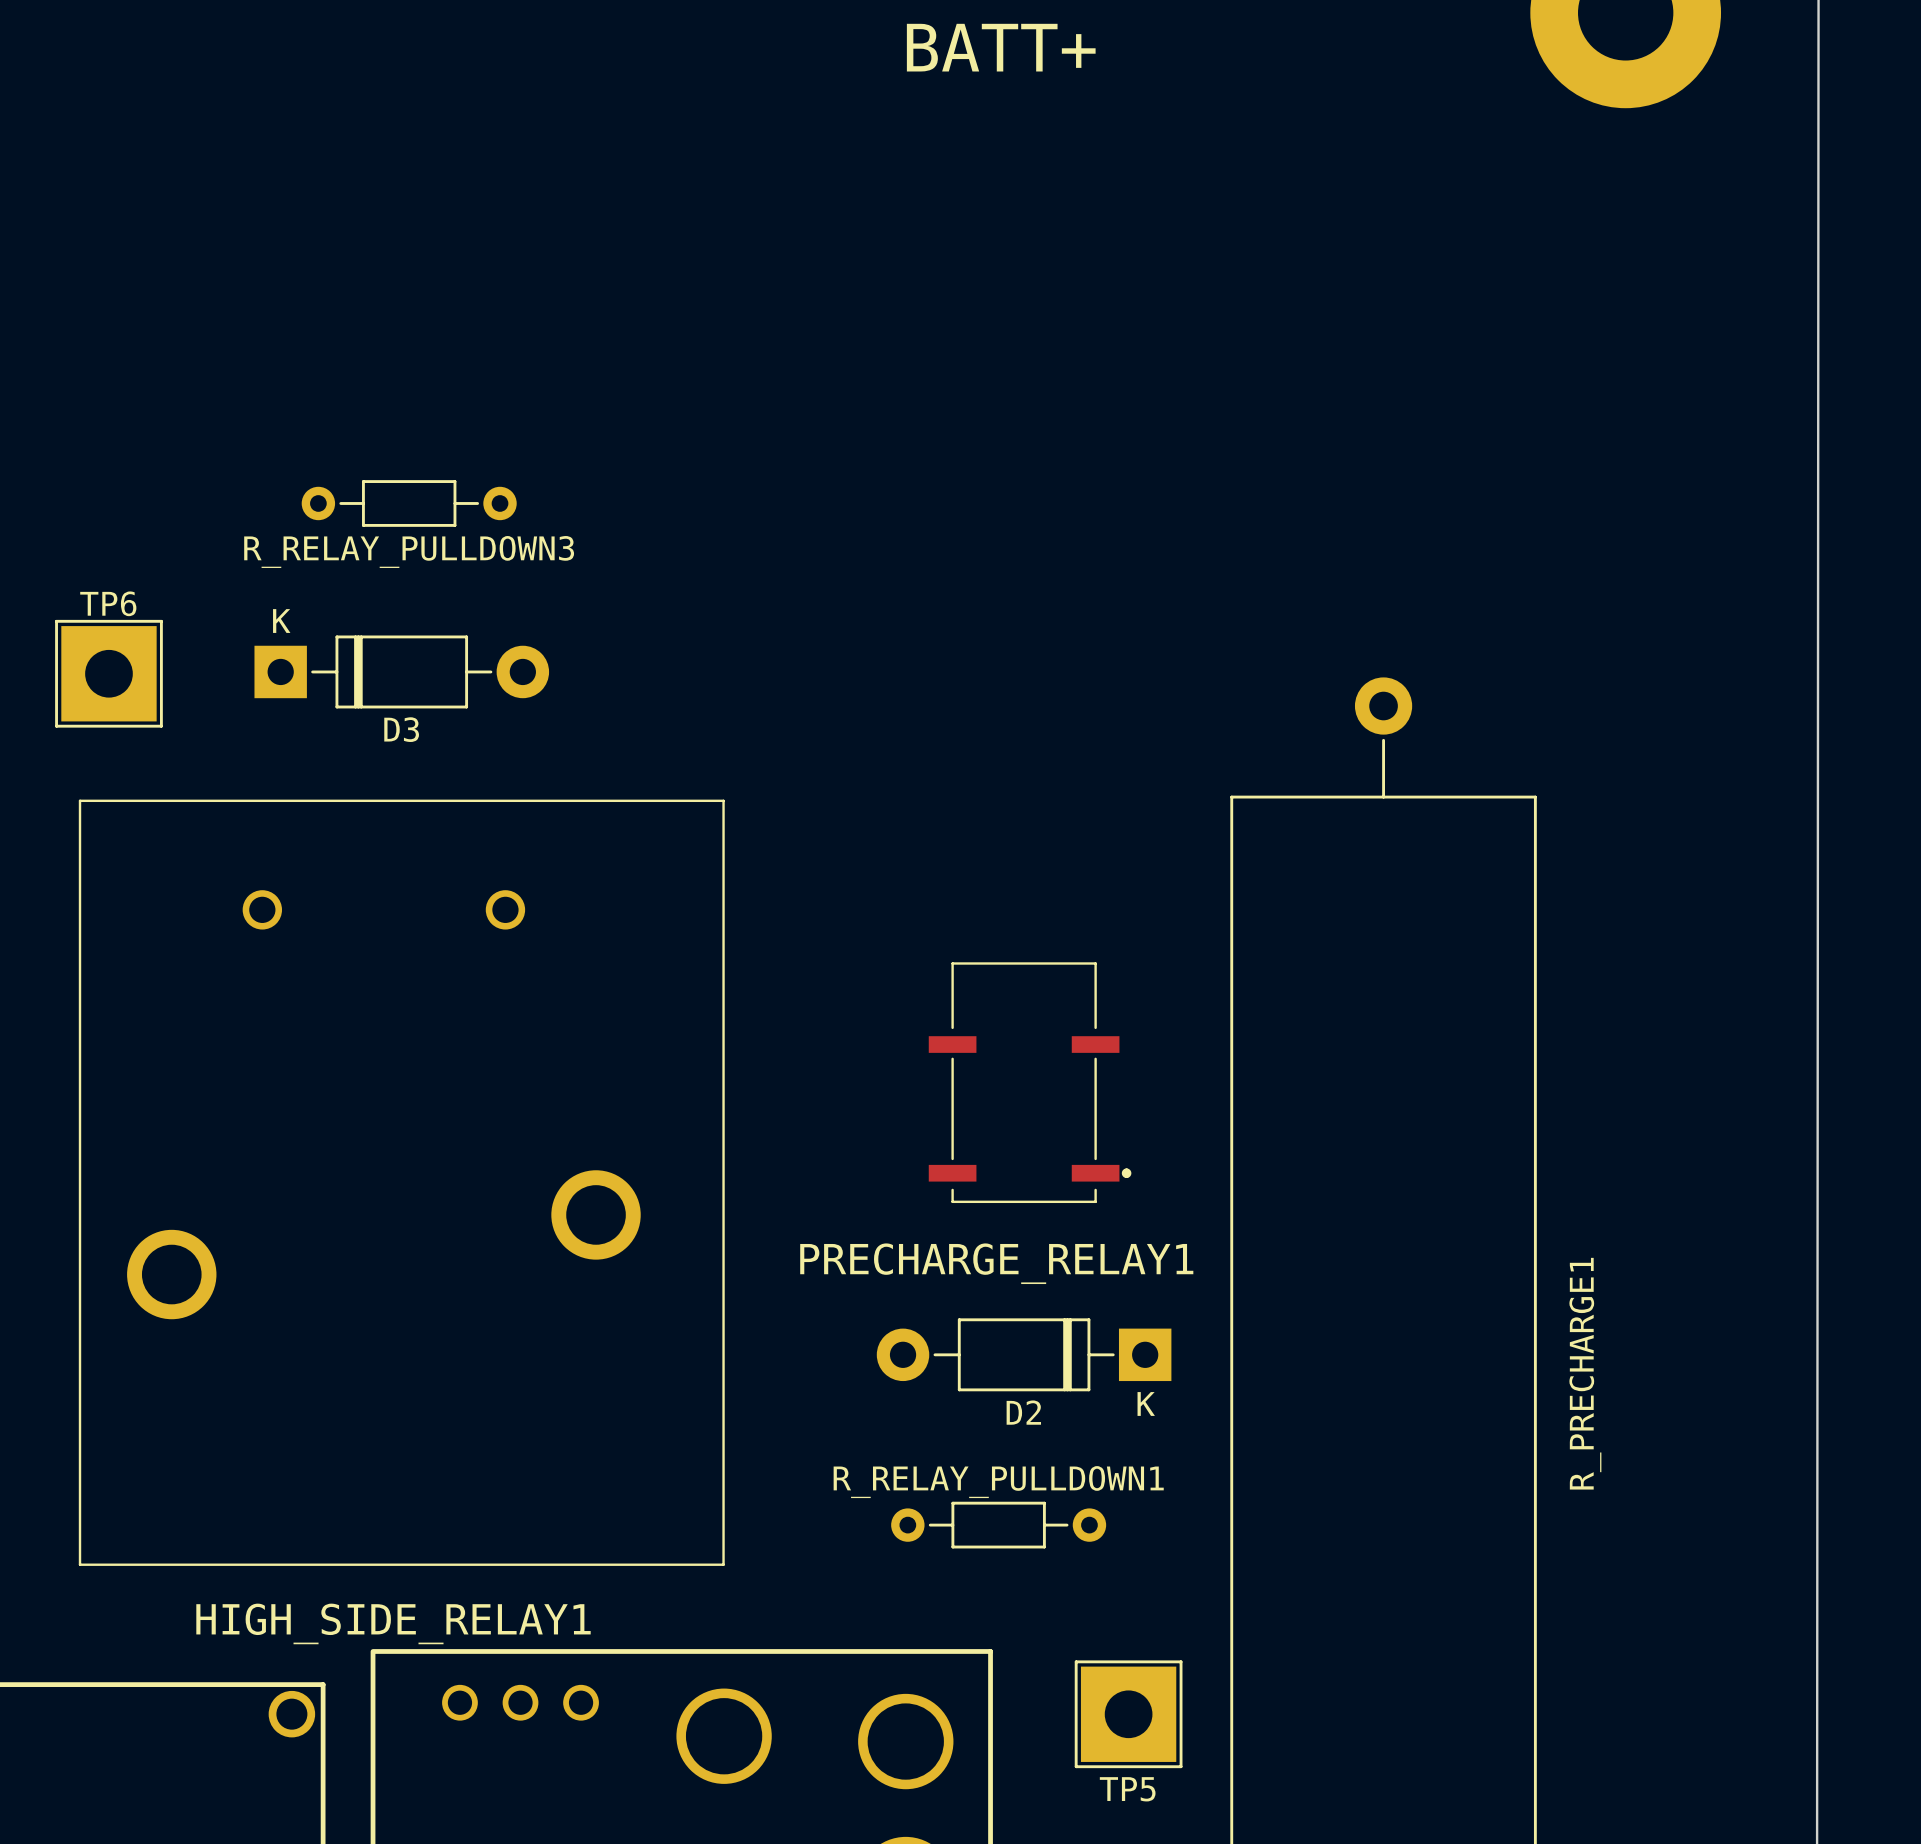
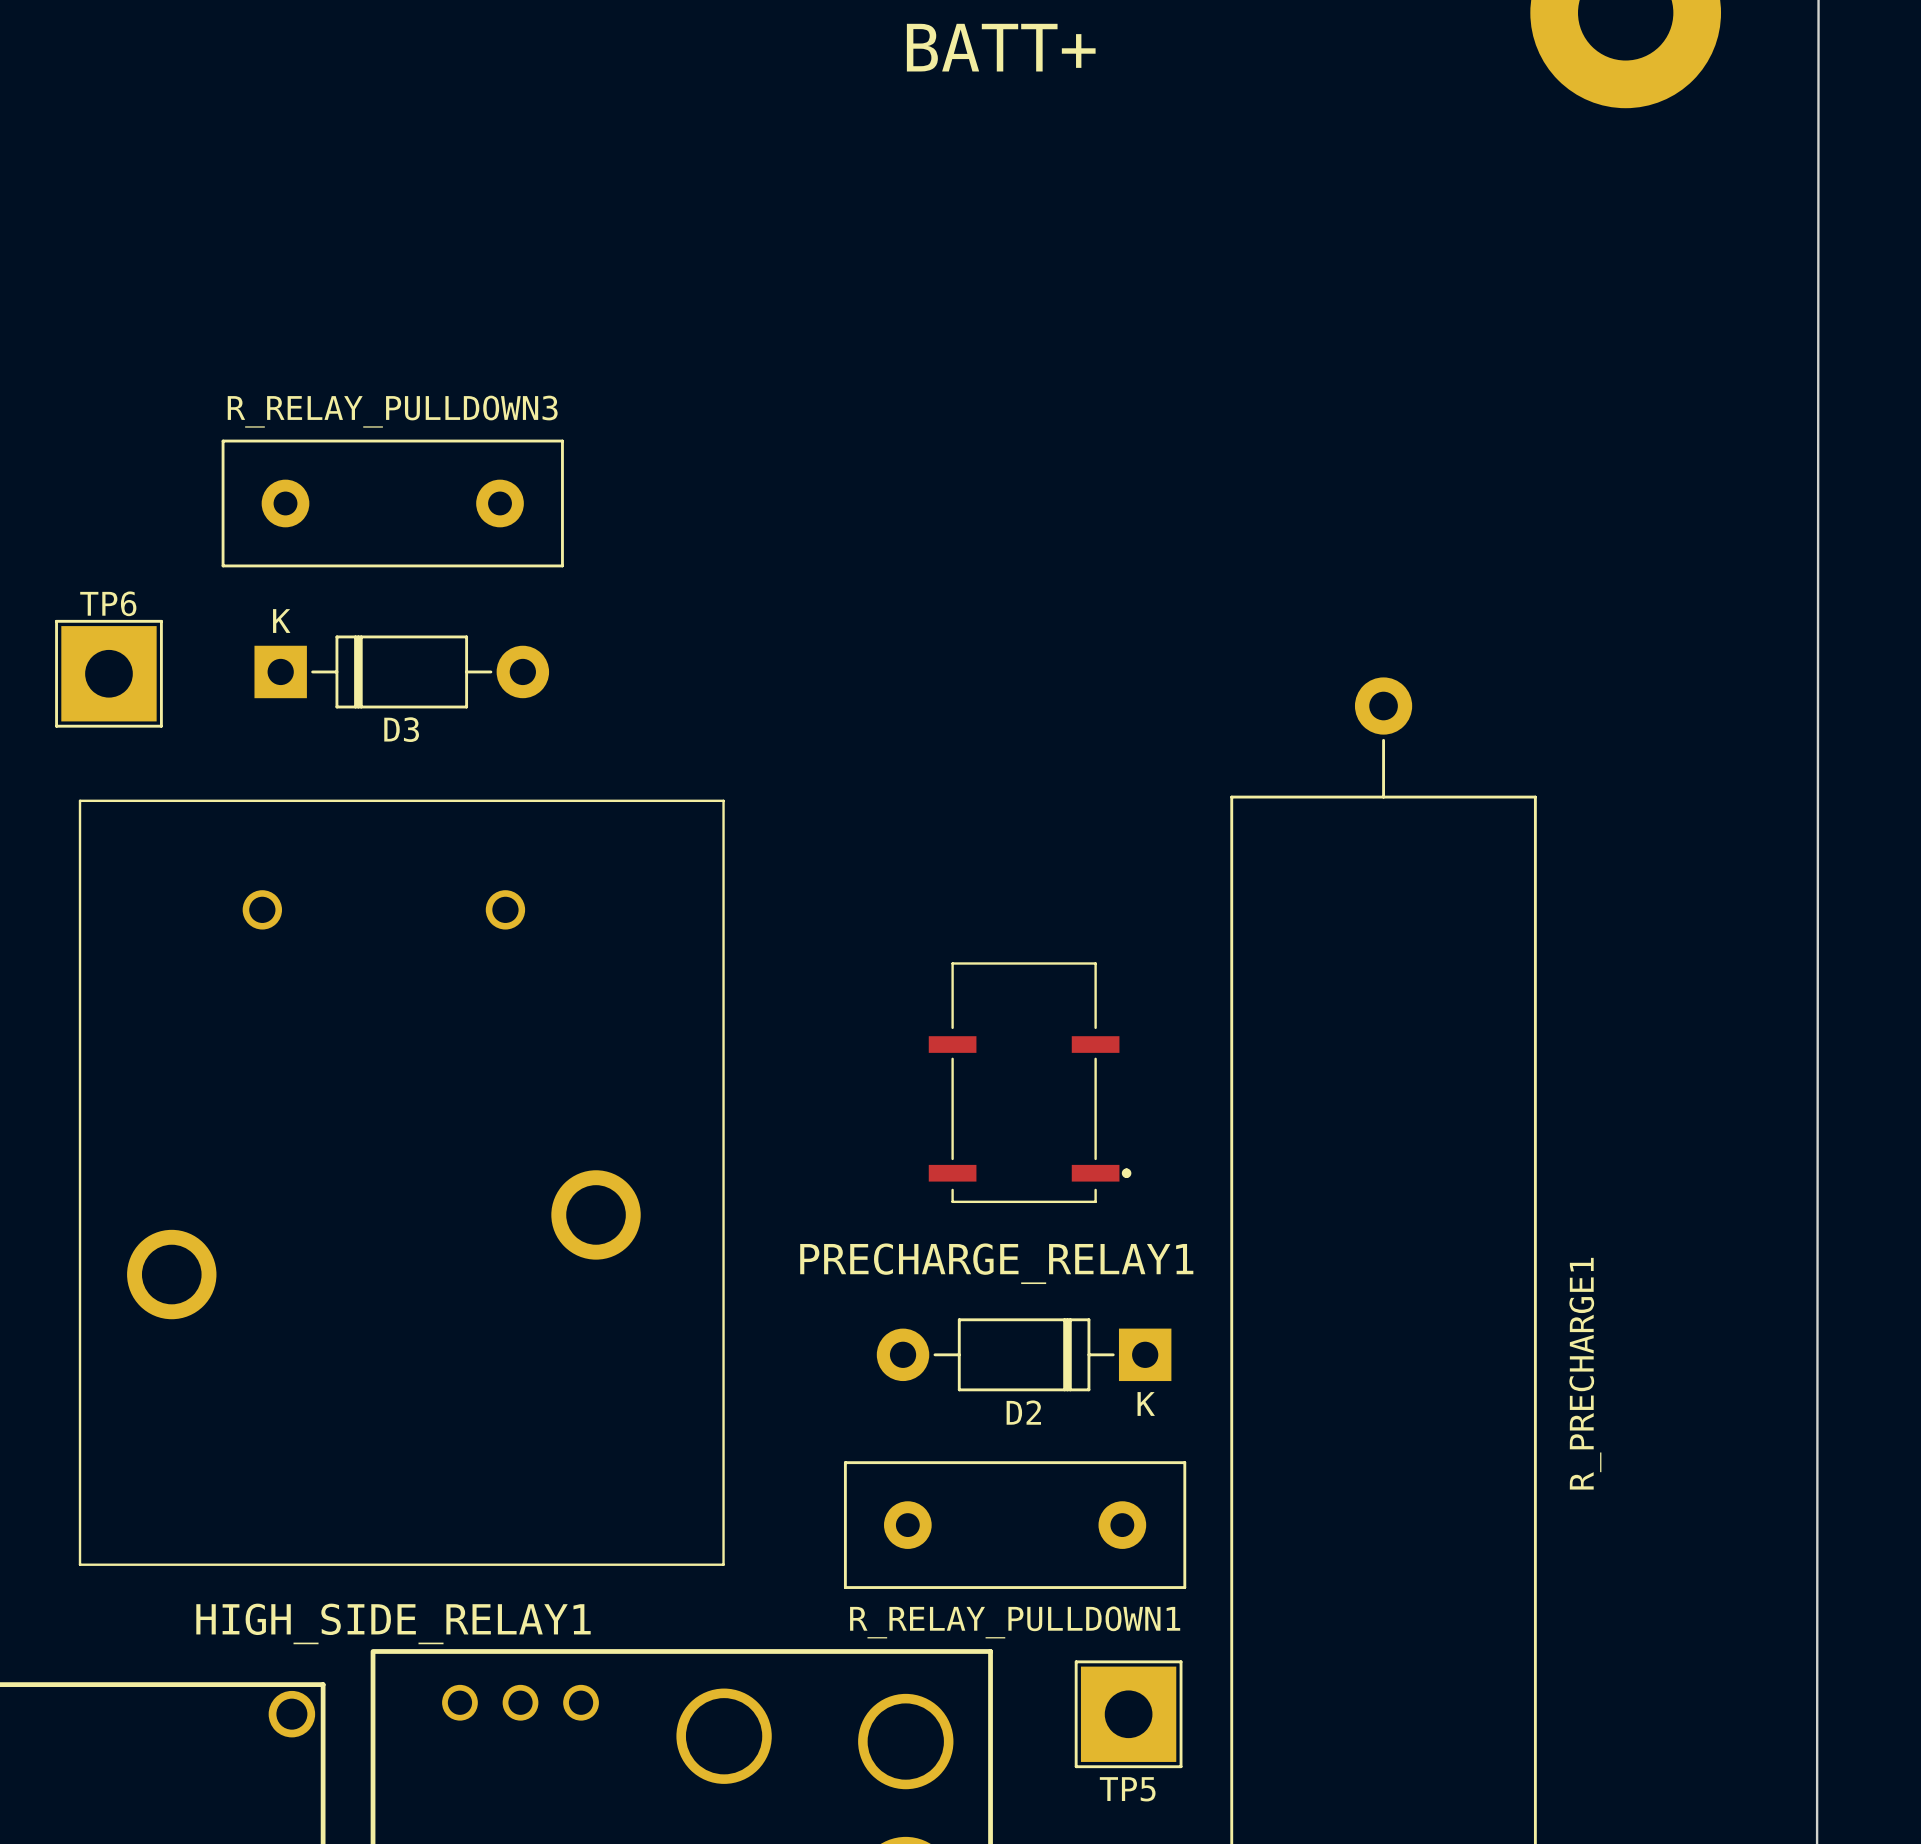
R_RELAY_PULLDOWN3 footprint: [301, 480, 517, 527] -> [221, 439, 564, 568]
R_RELAY_PULLDOWN3 name position: R_RELAY_PULLDOWN3 (409, 551) -> R_RELAY_PULLDOWN3 (392, 411)
R_RELAY_PULLDOWN1 name position: R_RELAY_PULLDOWN1 (998, 1482) -> R_RELAY_PULLDOWN1 (1015, 1622)
R_RELAY_PULLDOWN1 footprint: [891, 1501, 1107, 1549] -> [843, 1461, 1187, 1589]

